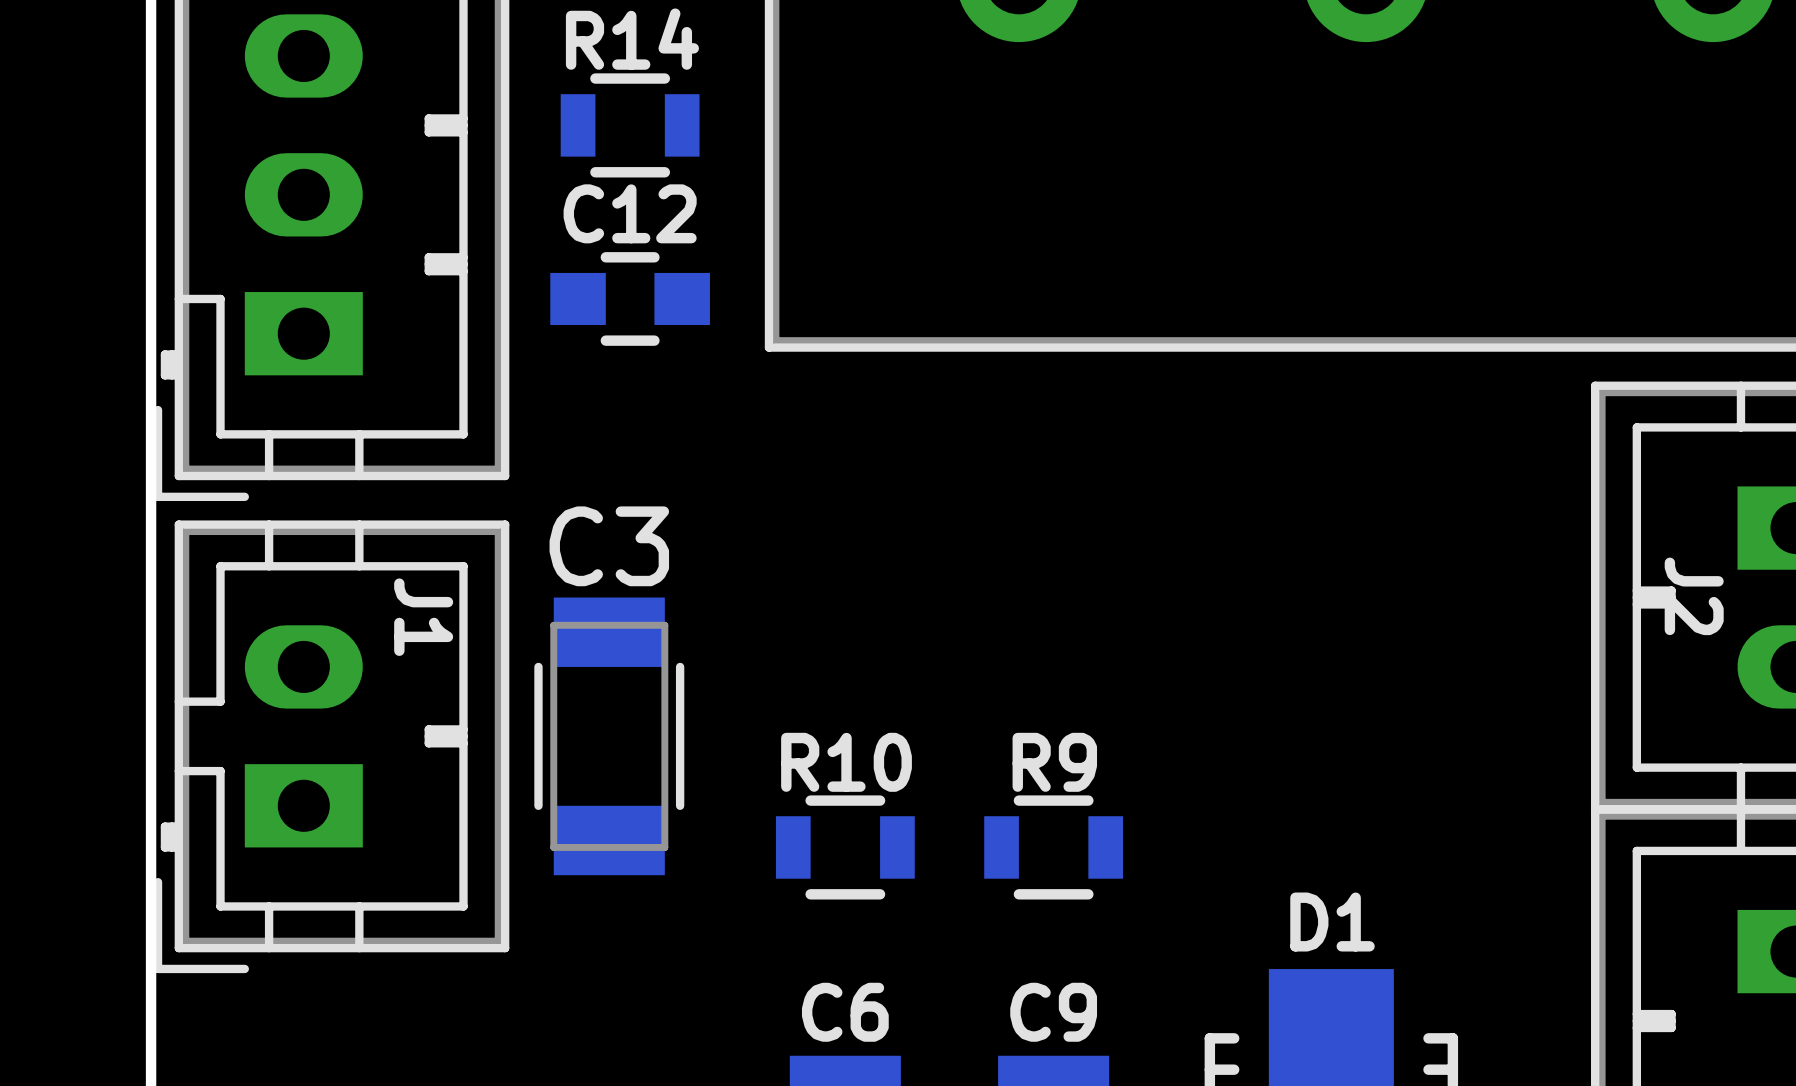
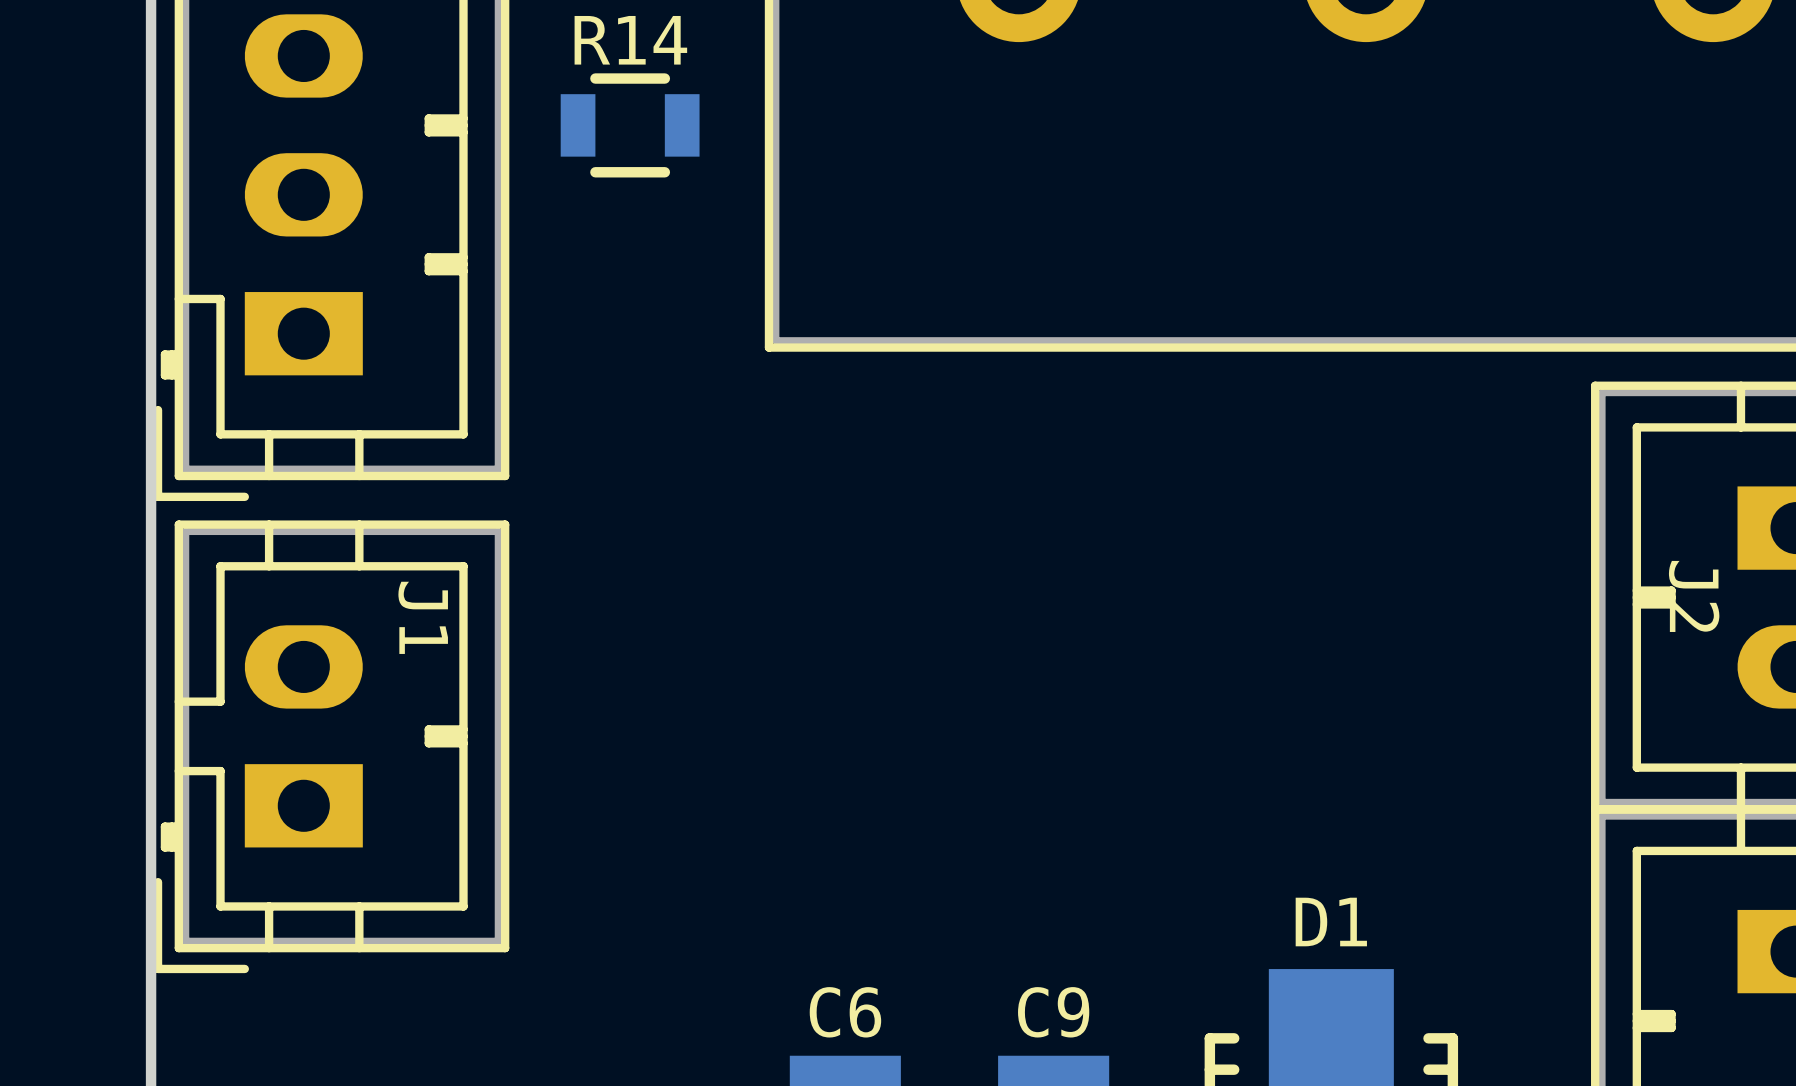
C12: (630, 298) -> none
C3: (609, 736) -> none
R10: (845, 847) -> none
R9: (1053, 847) -> none

